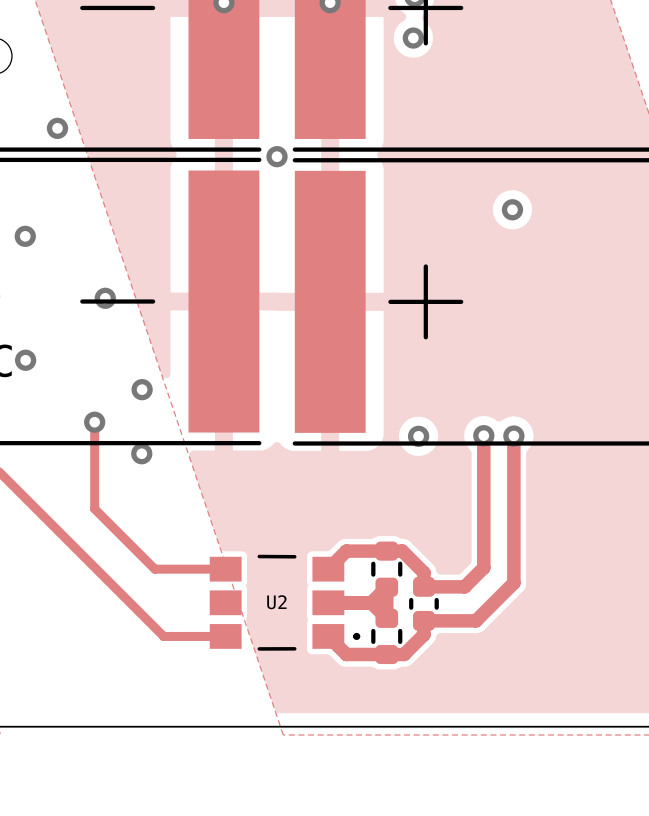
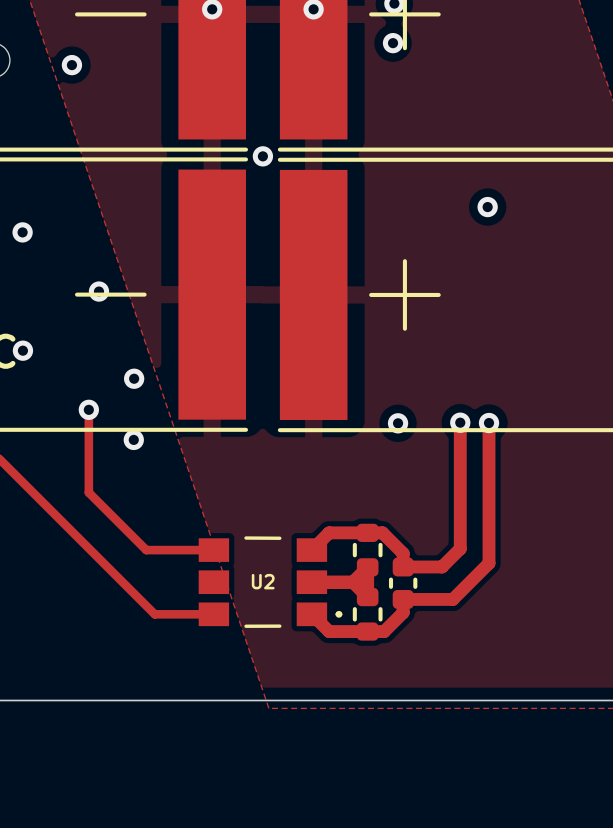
via position: (57, 128) -> (71, 65)

